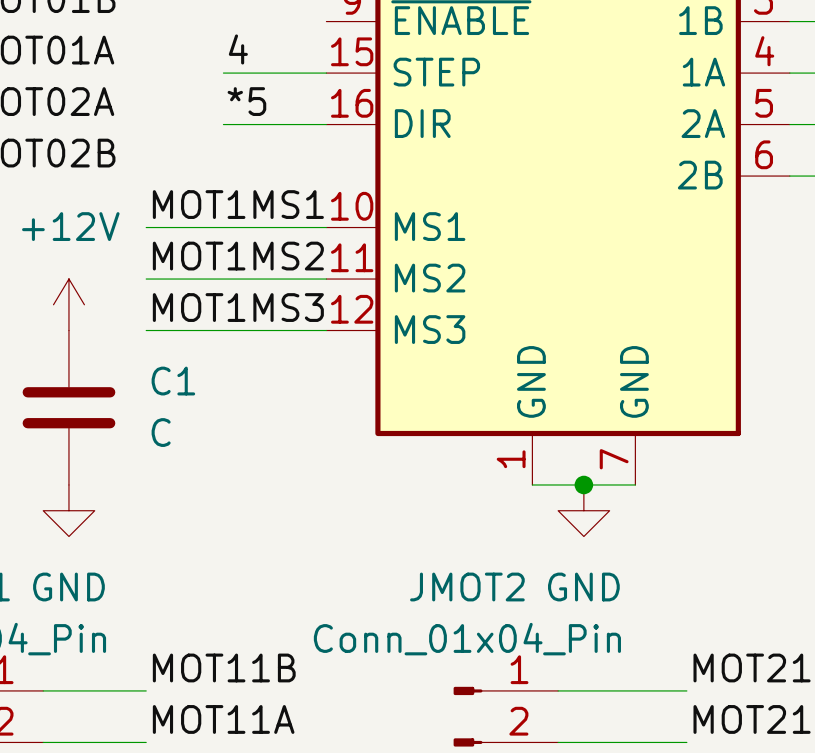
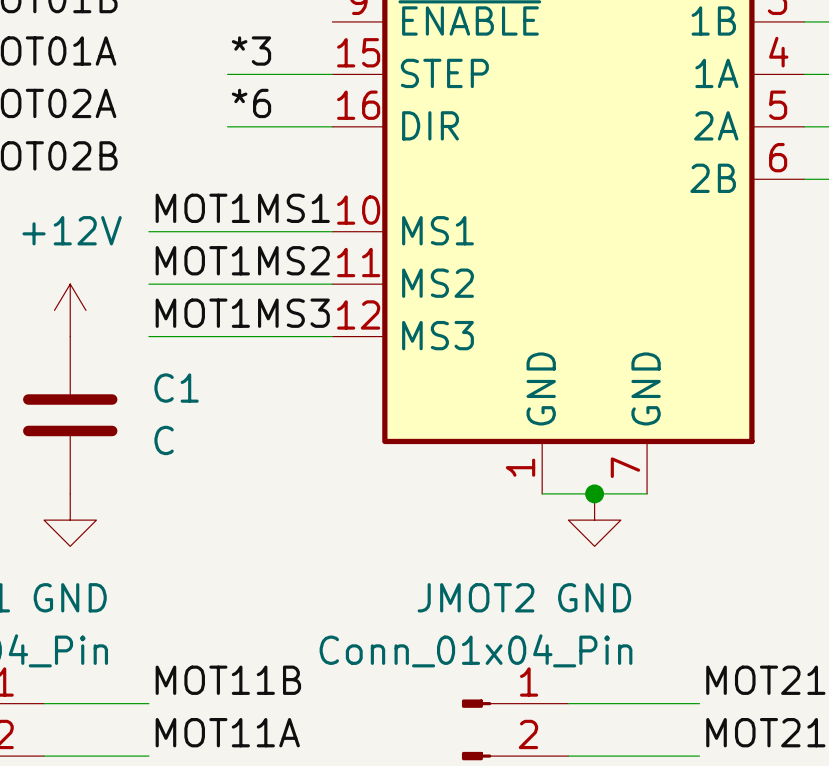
label: 4 (238, 49) -> *3 (251, 51)
label: *5 (246, 101) -> *6 (251, 103)

